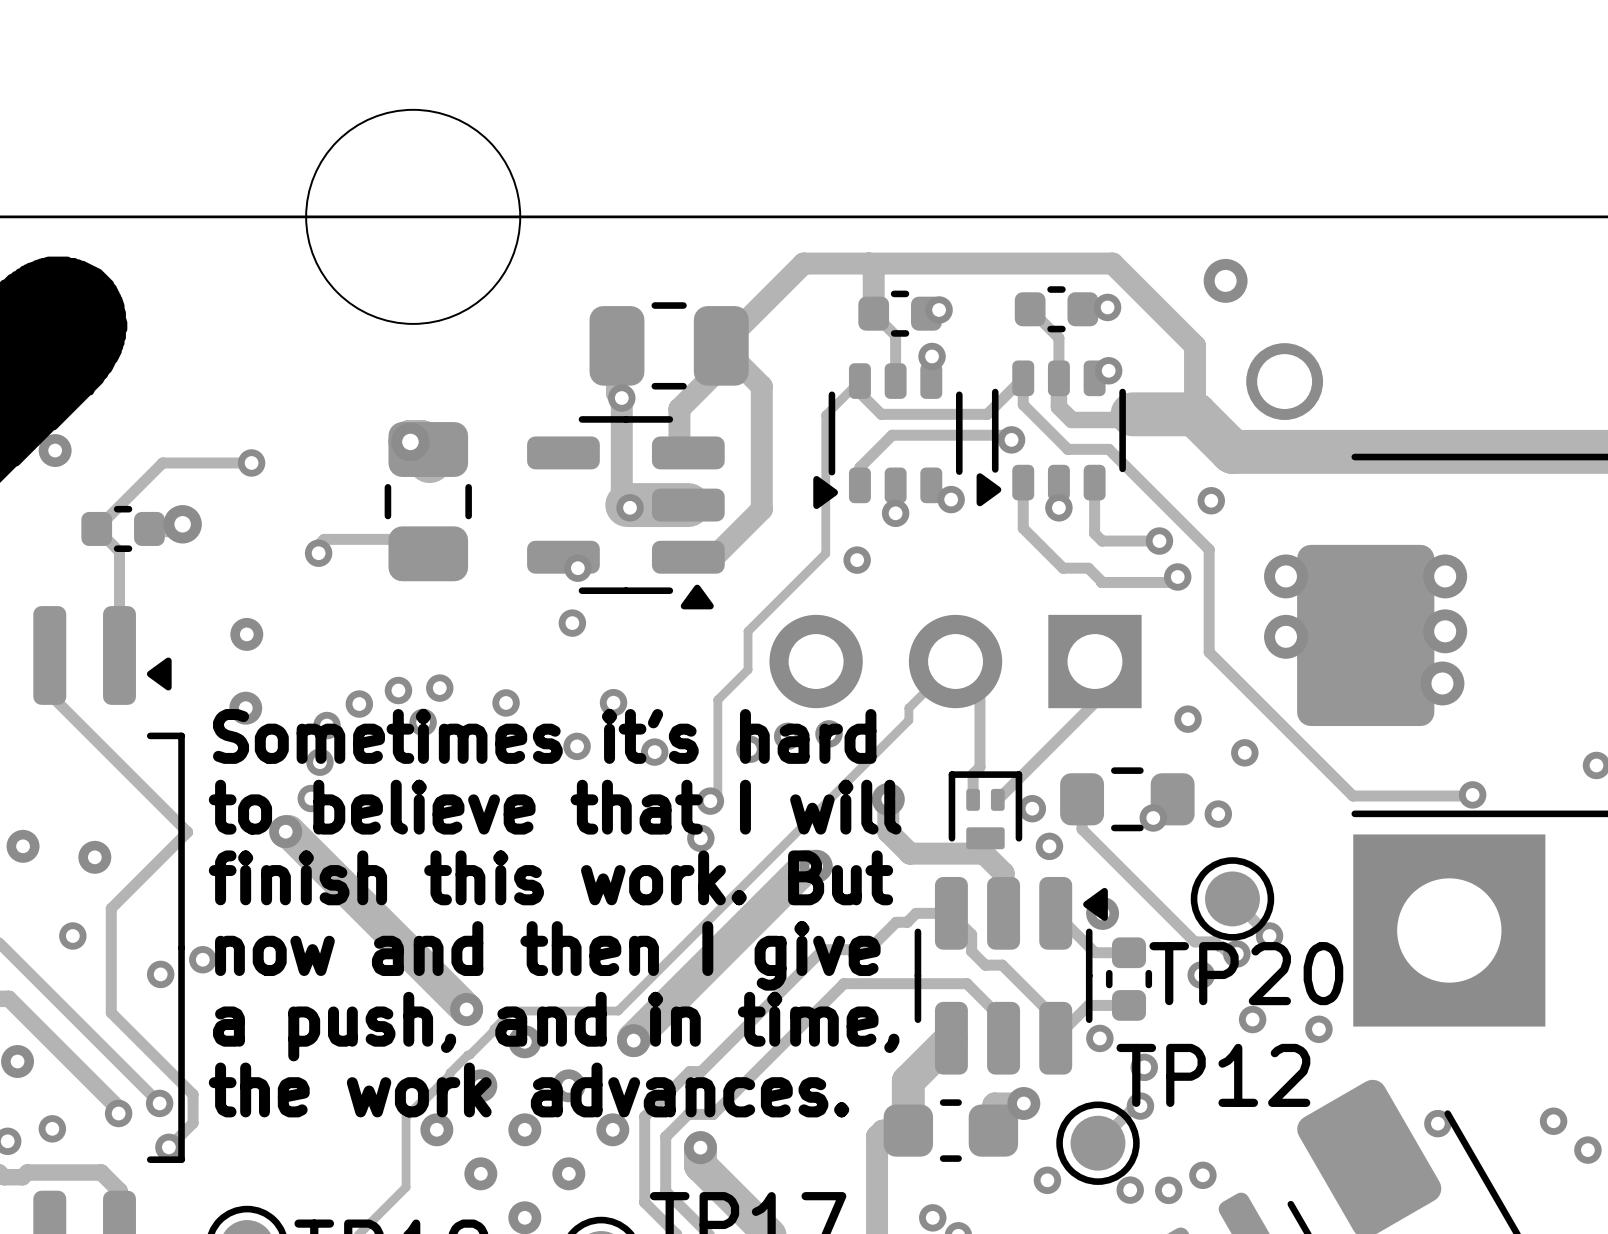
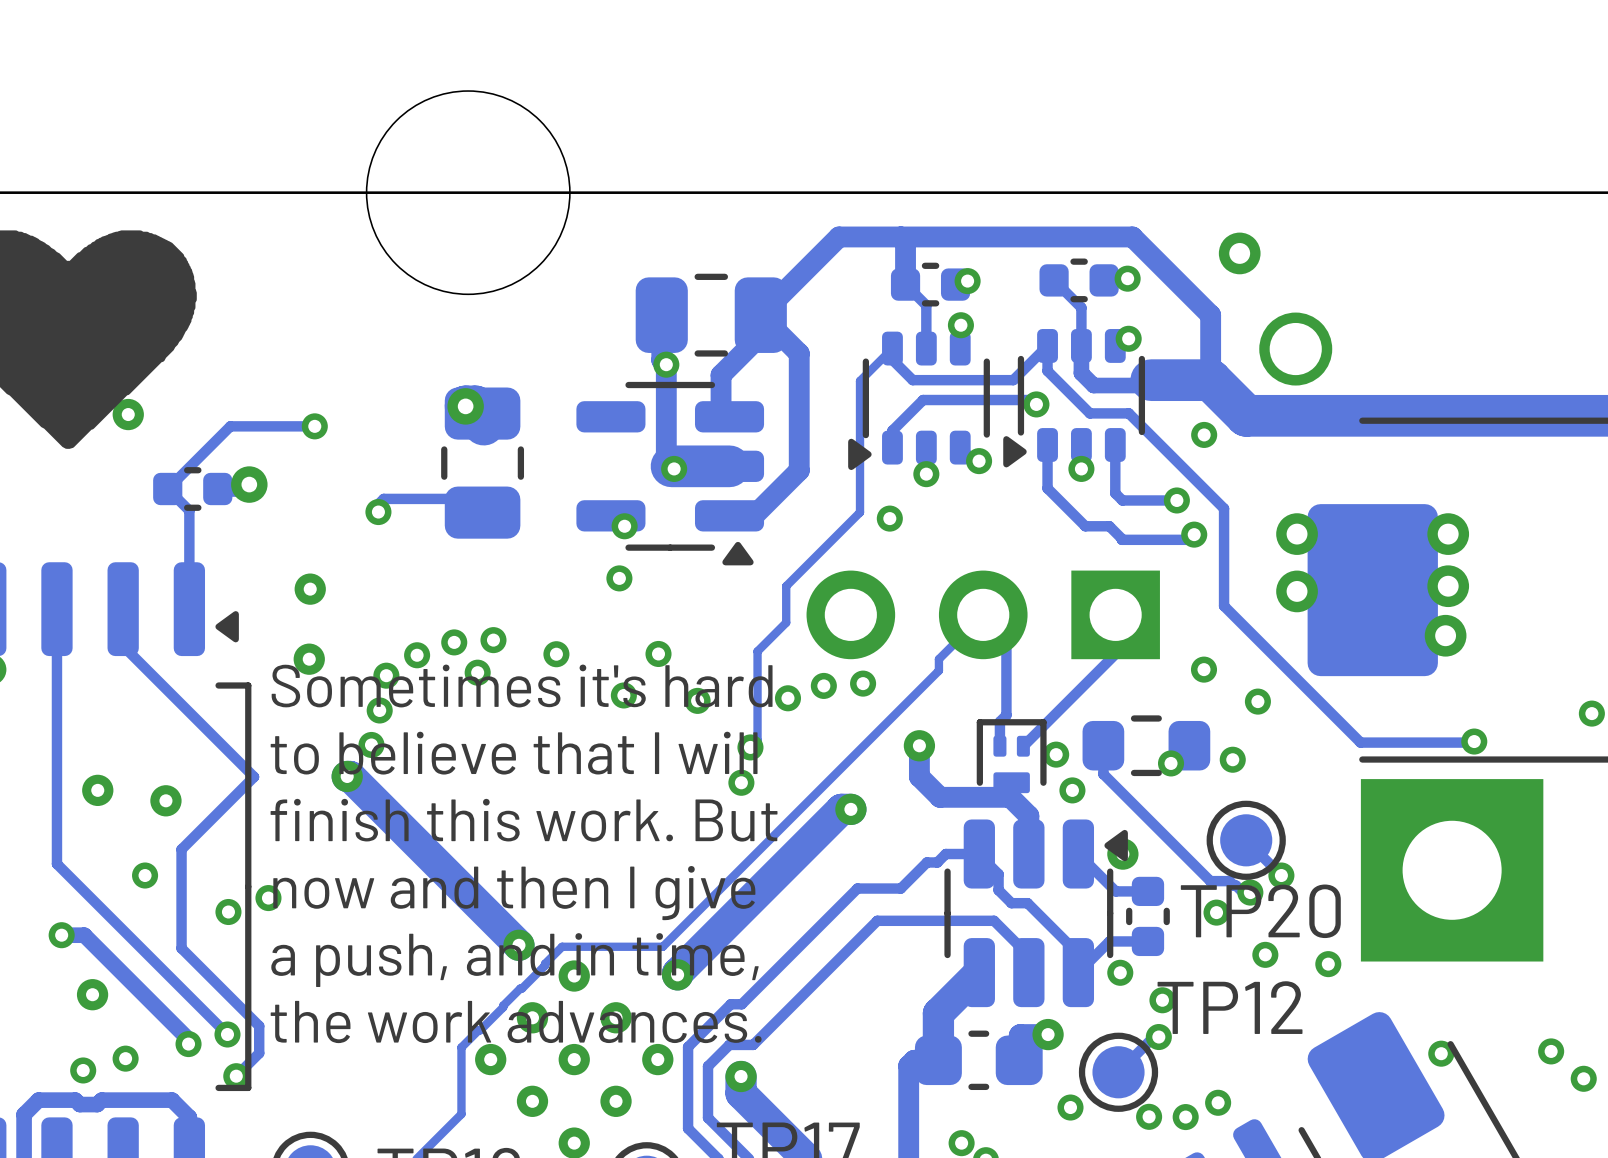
via position: (1211, 500) -> (1204, 434)

